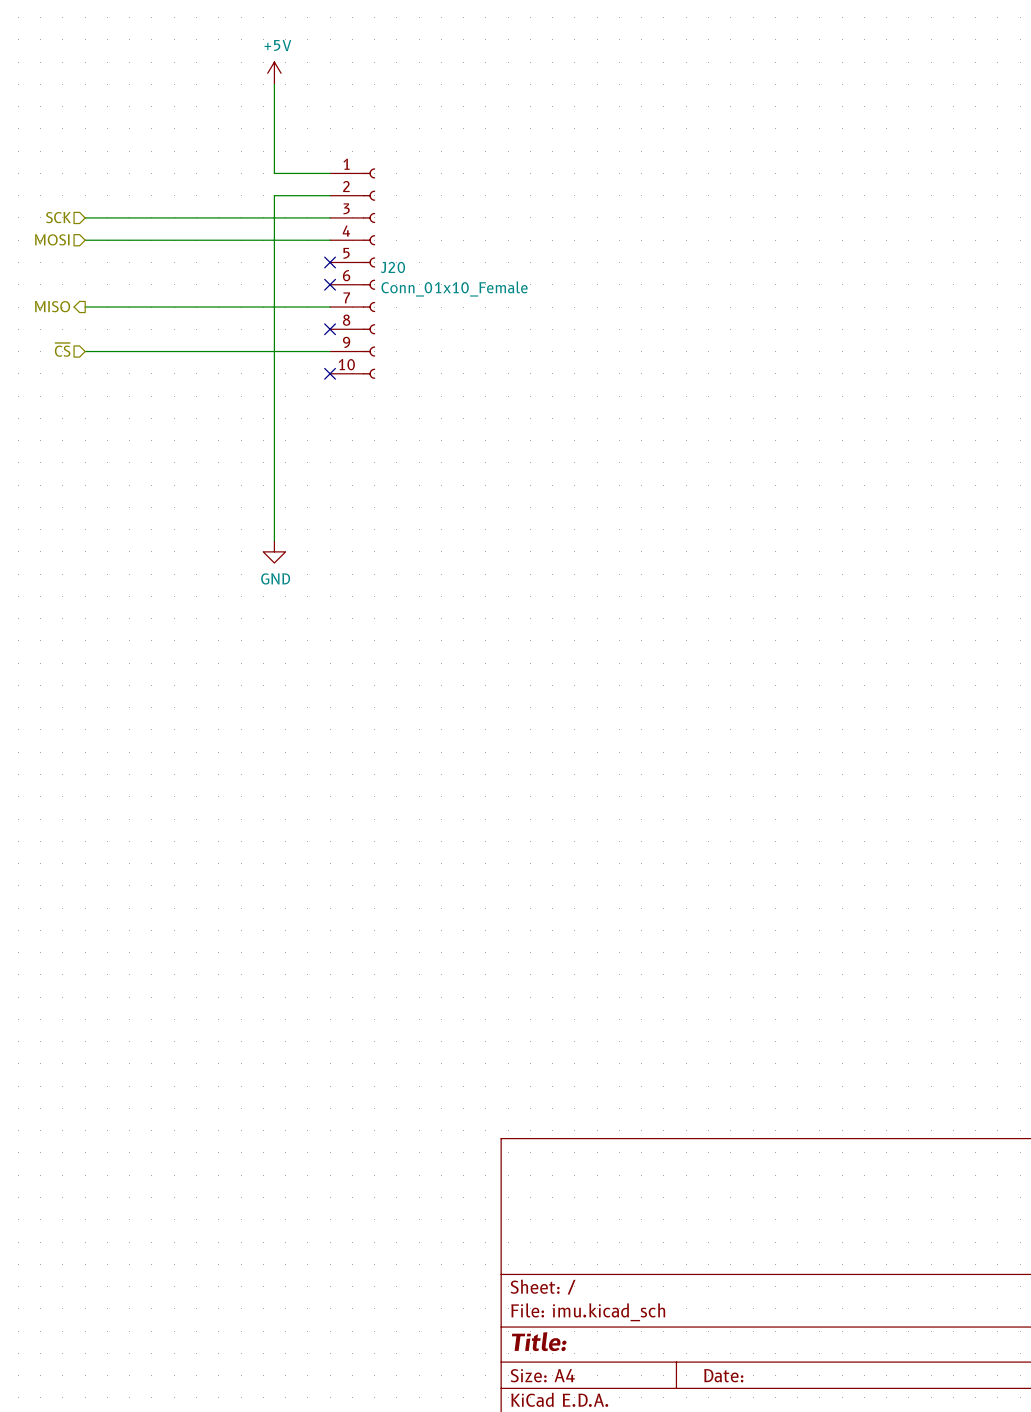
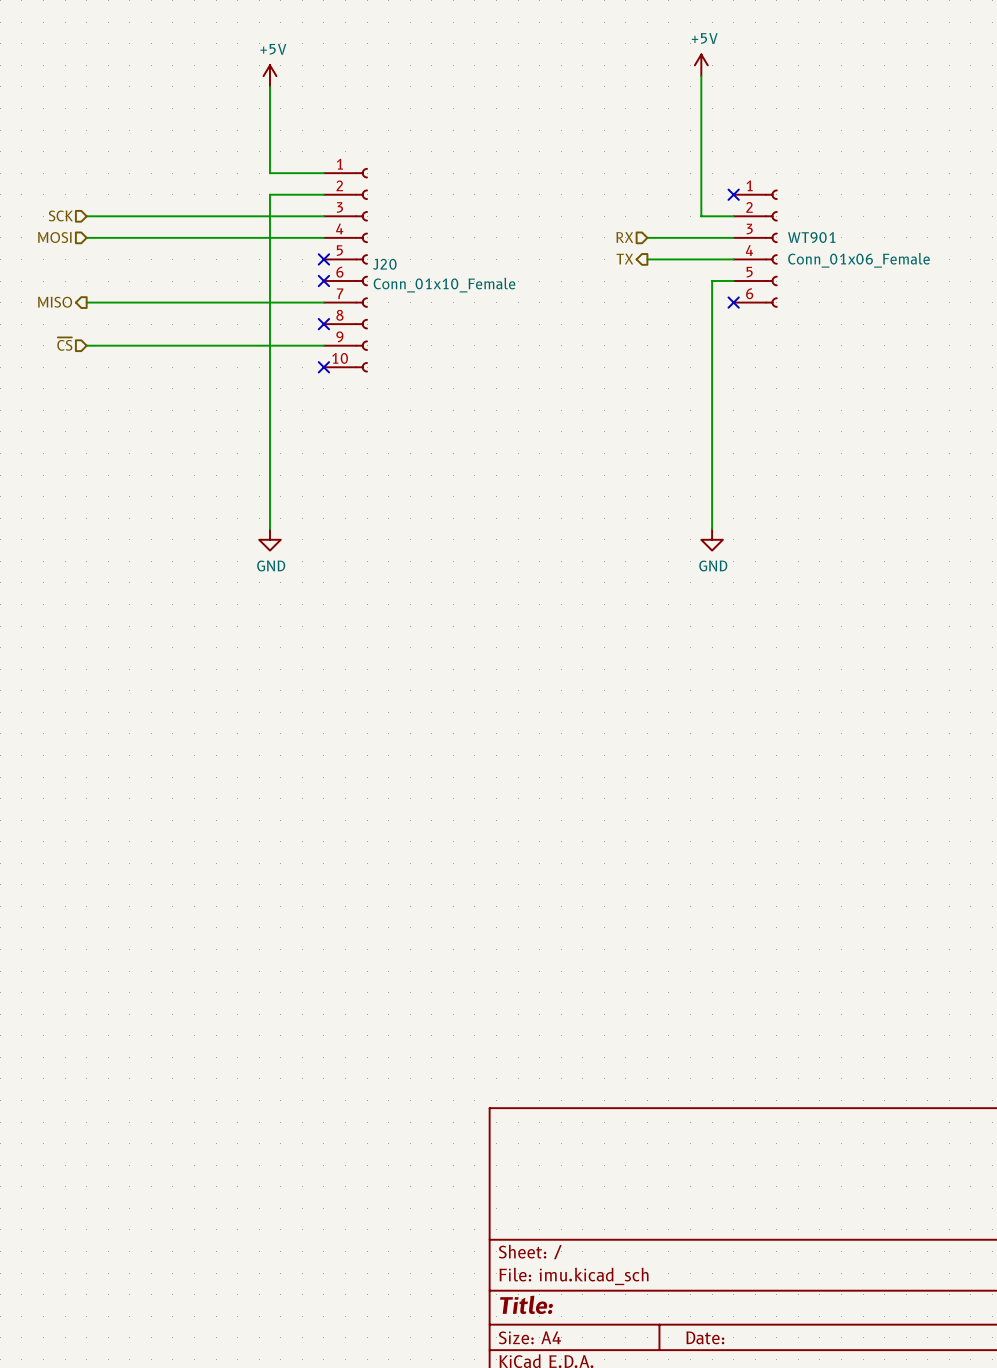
power symbol: none -> +5V (701, 65)
wire: none -> (701, 76) (701, 216) (733, 216)
no-connect mark: none -> (733, 194)
hierarchical label: none -> RX (624, 237)
wire: none -> (647, 237) (733, 237)
WT901: none -> Conn_01x06_Female (755, 248)
hierarchical label: none -> TX (624, 259)
wire: none -> (647, 259) (733, 259)
wire: none -> (733, 281) (712, 281) (712, 529)
no-connect mark: none -> (733, 302)
power symbol: none -> GND (712, 539)

